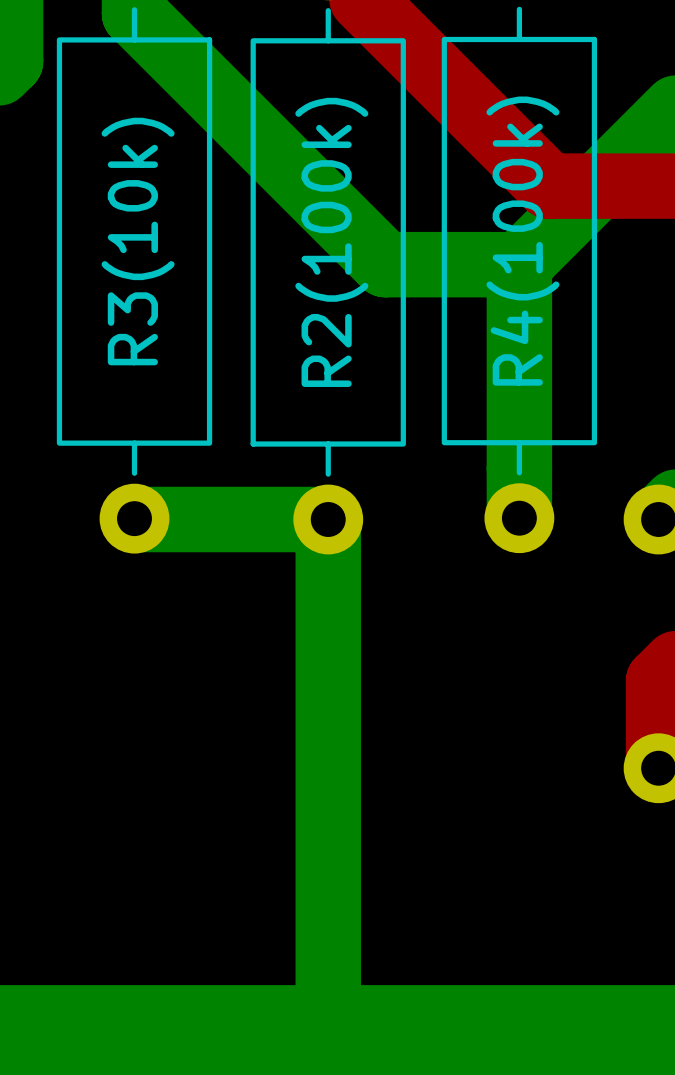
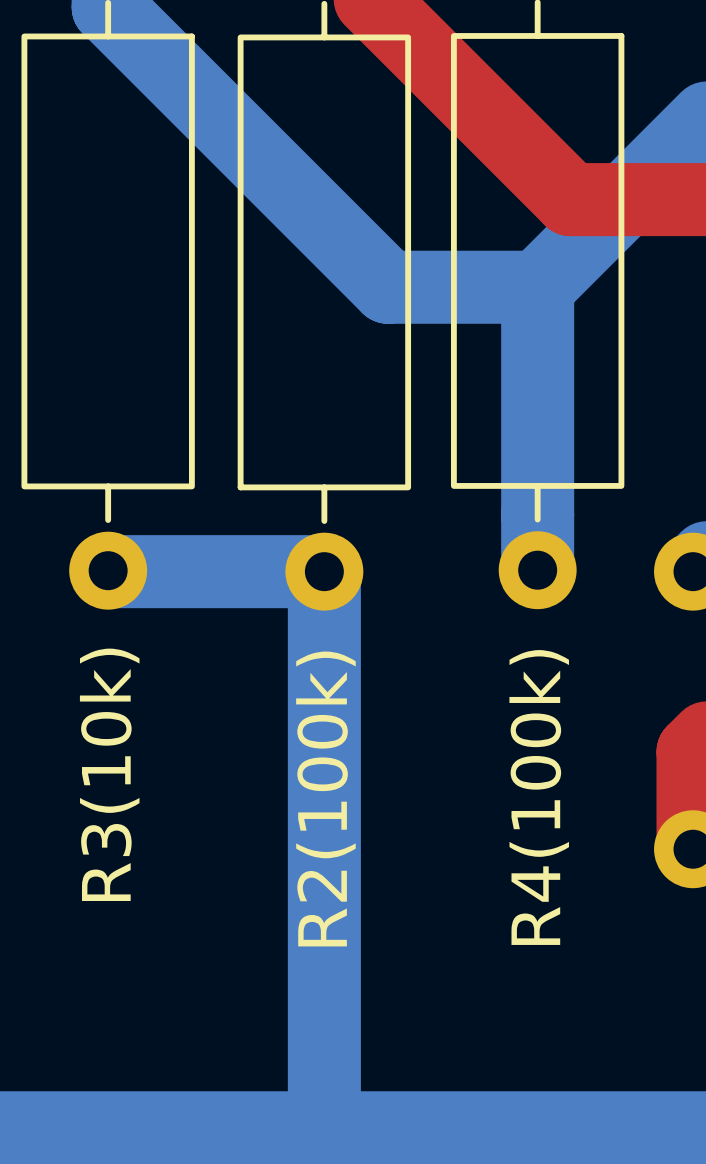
R3(10k) name position: R3(10k) (138, 241) -> R3(10k) (109, 774)
R4(100k) name position: R4(100k) (522, 241) -> R4(100k) (539, 797)
R2(100k) name position: R2(100k) (331, 242) -> R2(100k) (325, 798)

